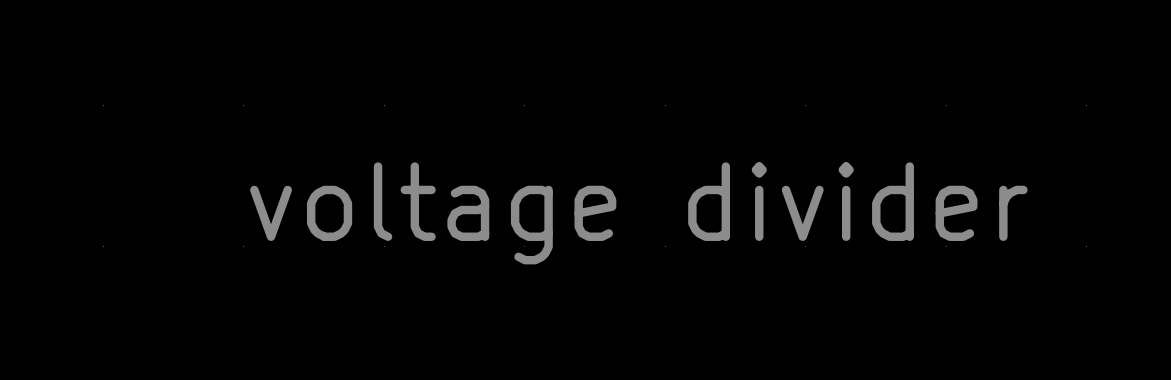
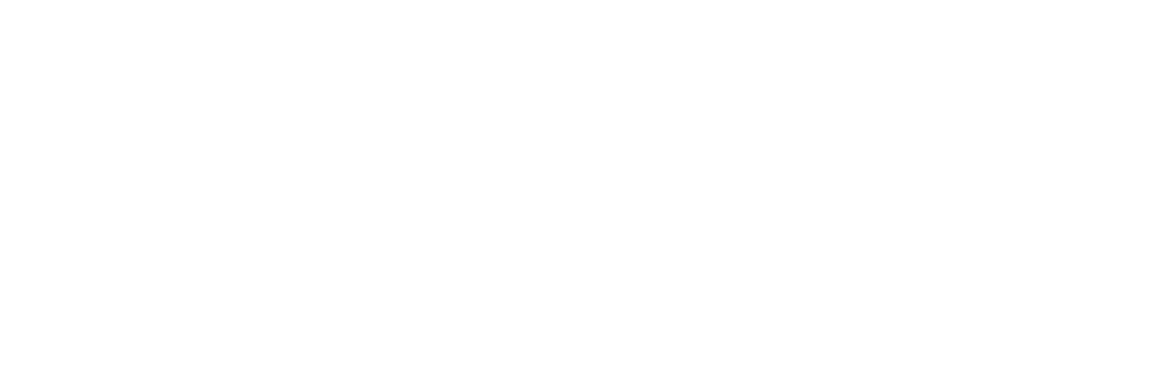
text: voltage divider (638, 213) -> none

